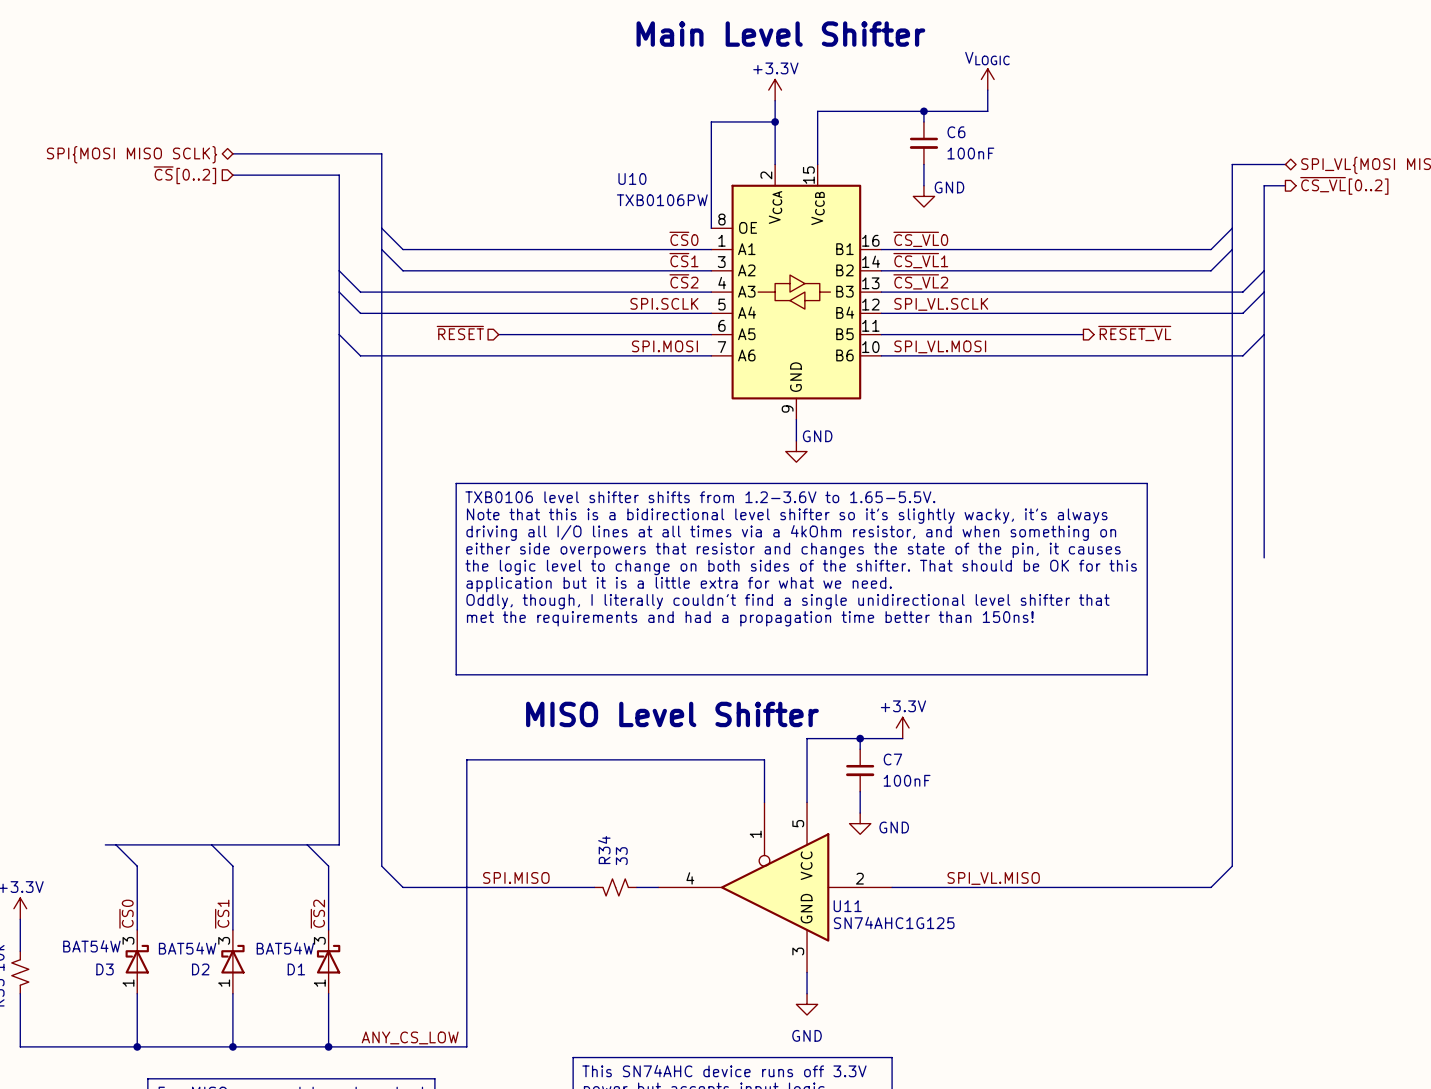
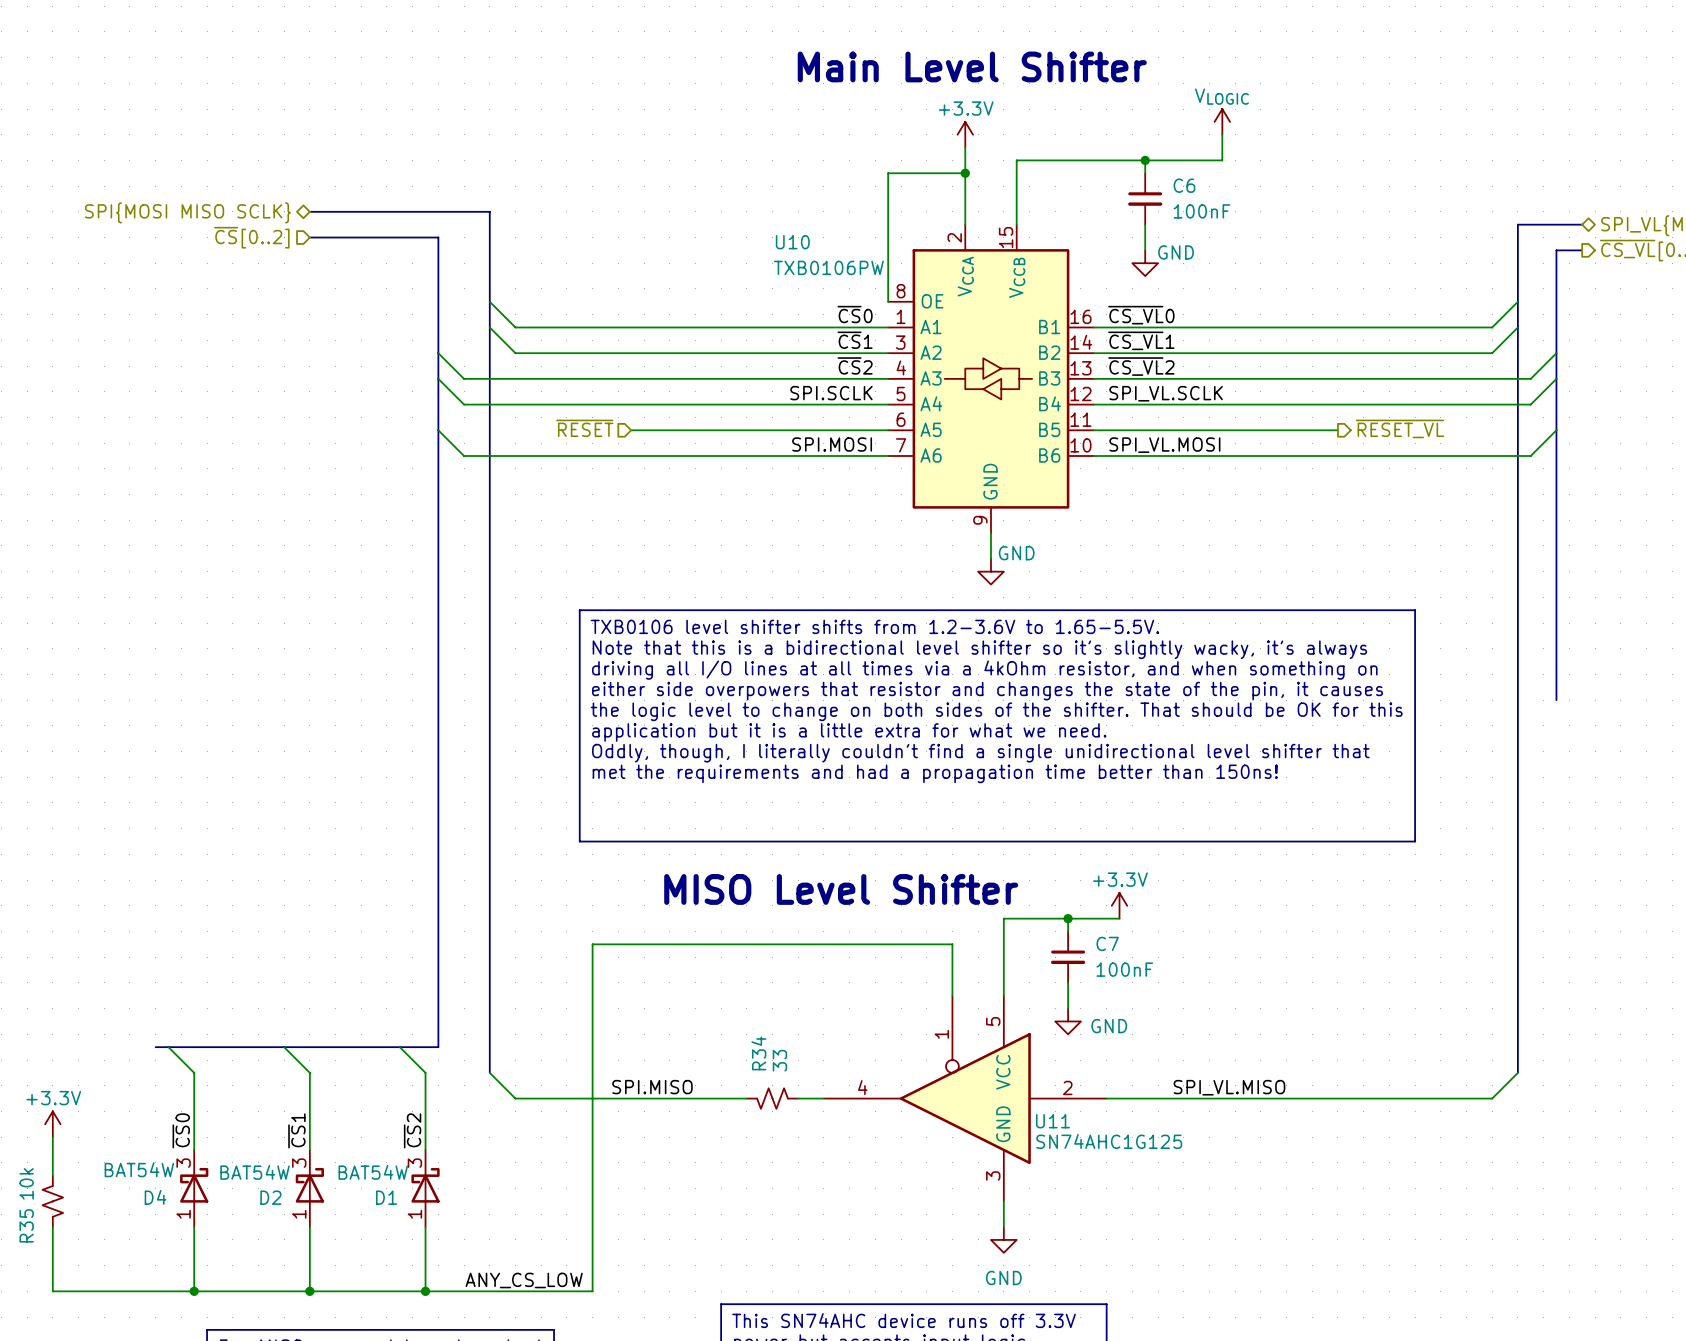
D3 name: D3 (105, 969) -> D4 (155, 1197)

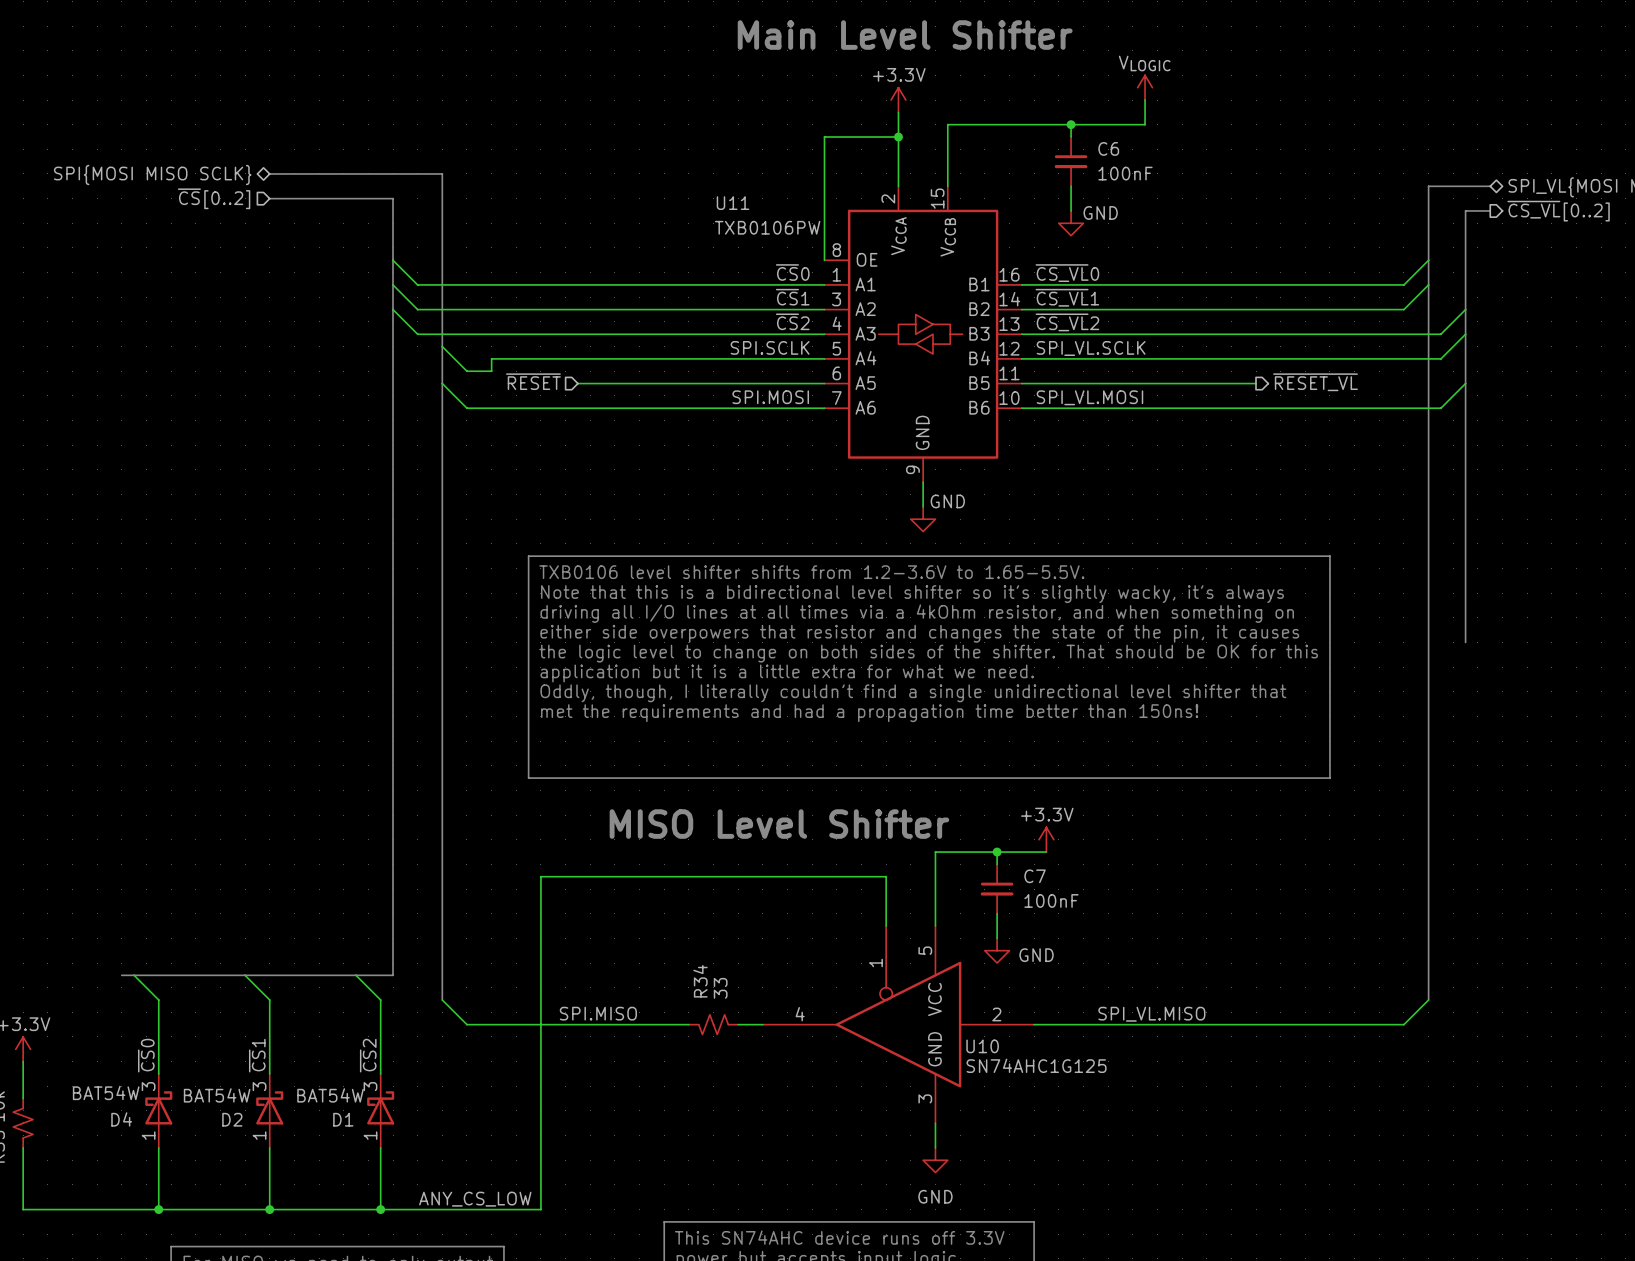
U10 name: U10 (792, 242) -> U11 (733, 203)
wire: (489, 301) (515, 327) -> (393, 260) (417, 284) (466, 284)
wire: (489, 327) (515, 353) -> (393, 284) (417, 309) (466, 309)
wire: (438, 378) (464, 404) (541, 404) -> (442, 346) (466, 371) (491, 371) (491, 358)
wire: (438, 430) (464, 455) (515, 455) -> (442, 383) (466, 408)
U11 name: U11 (1052, 1121) -> U10 (982, 1046)

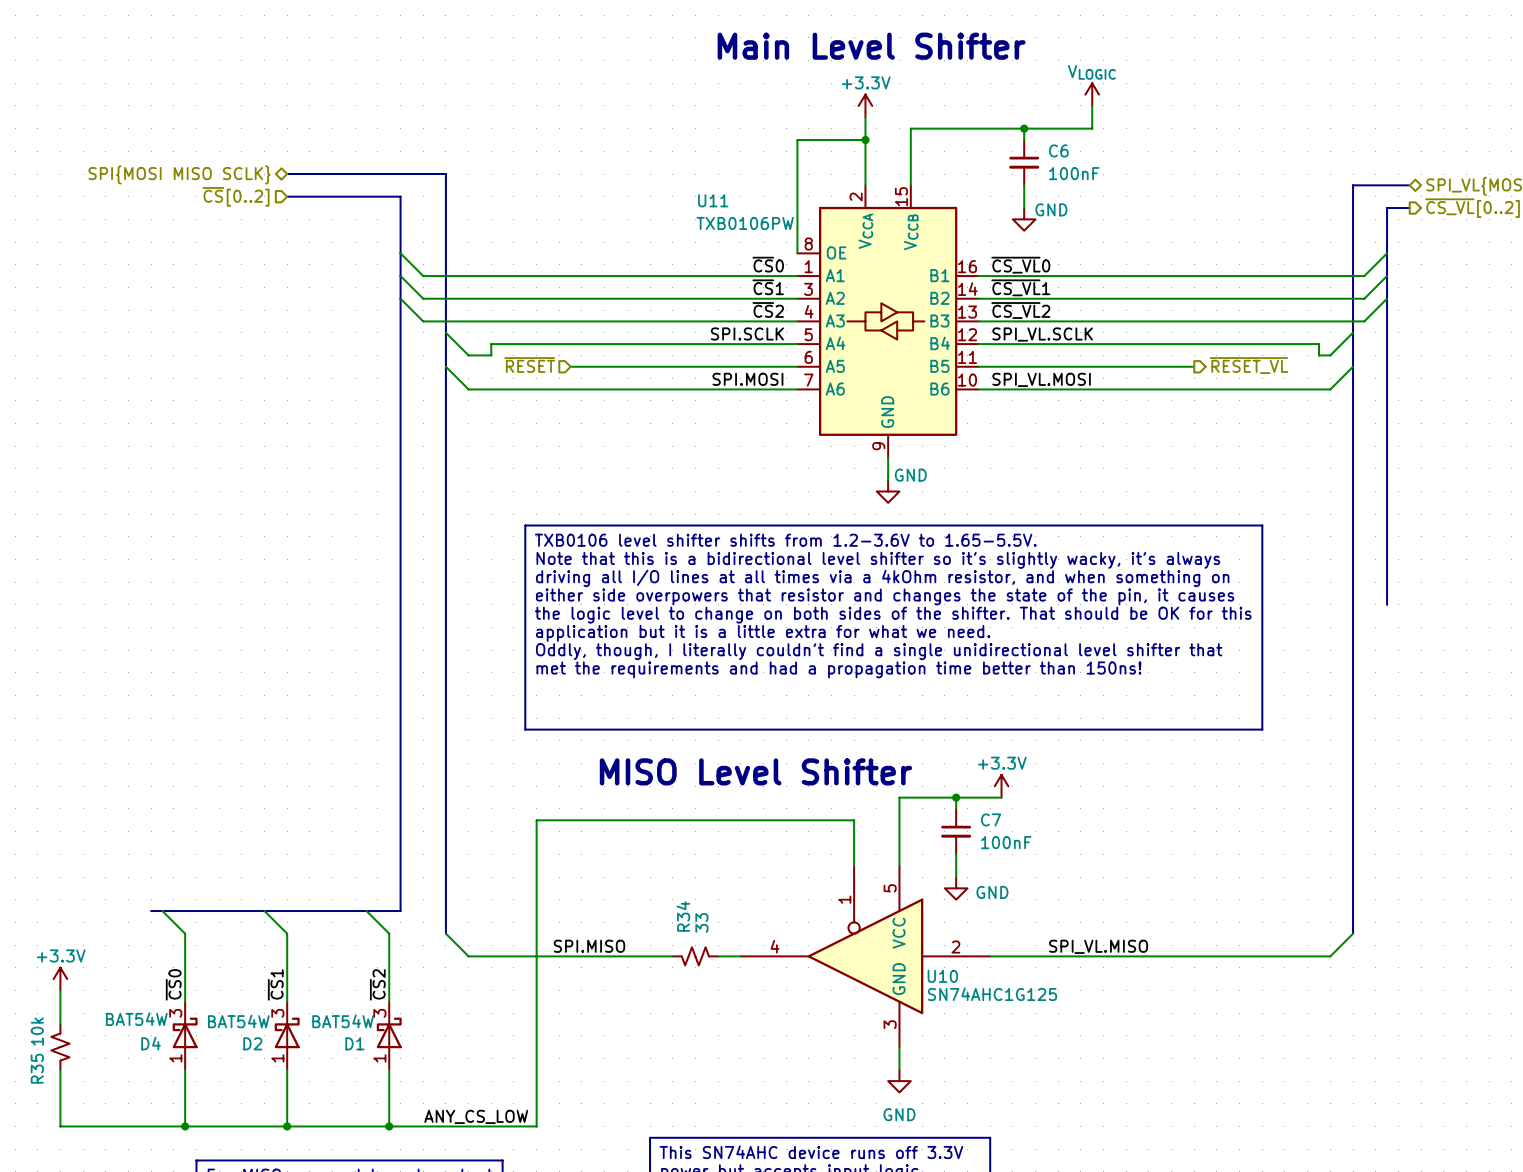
wire: (1428, 260) (1403, 284) -> (1387, 253) (1364, 276) (1330, 276)
wire: (1428, 284) (1403, 309) -> (1387, 276) (1364, 298) (1330, 298)
wire: (1465, 334) (1440, 358) (1391, 358) -> (1353, 332) (1330, 355) (1319, 355) (1319, 344)
wire: (1465, 383) (1440, 408) (1403, 408) -> (1353, 366) (1330, 389)

